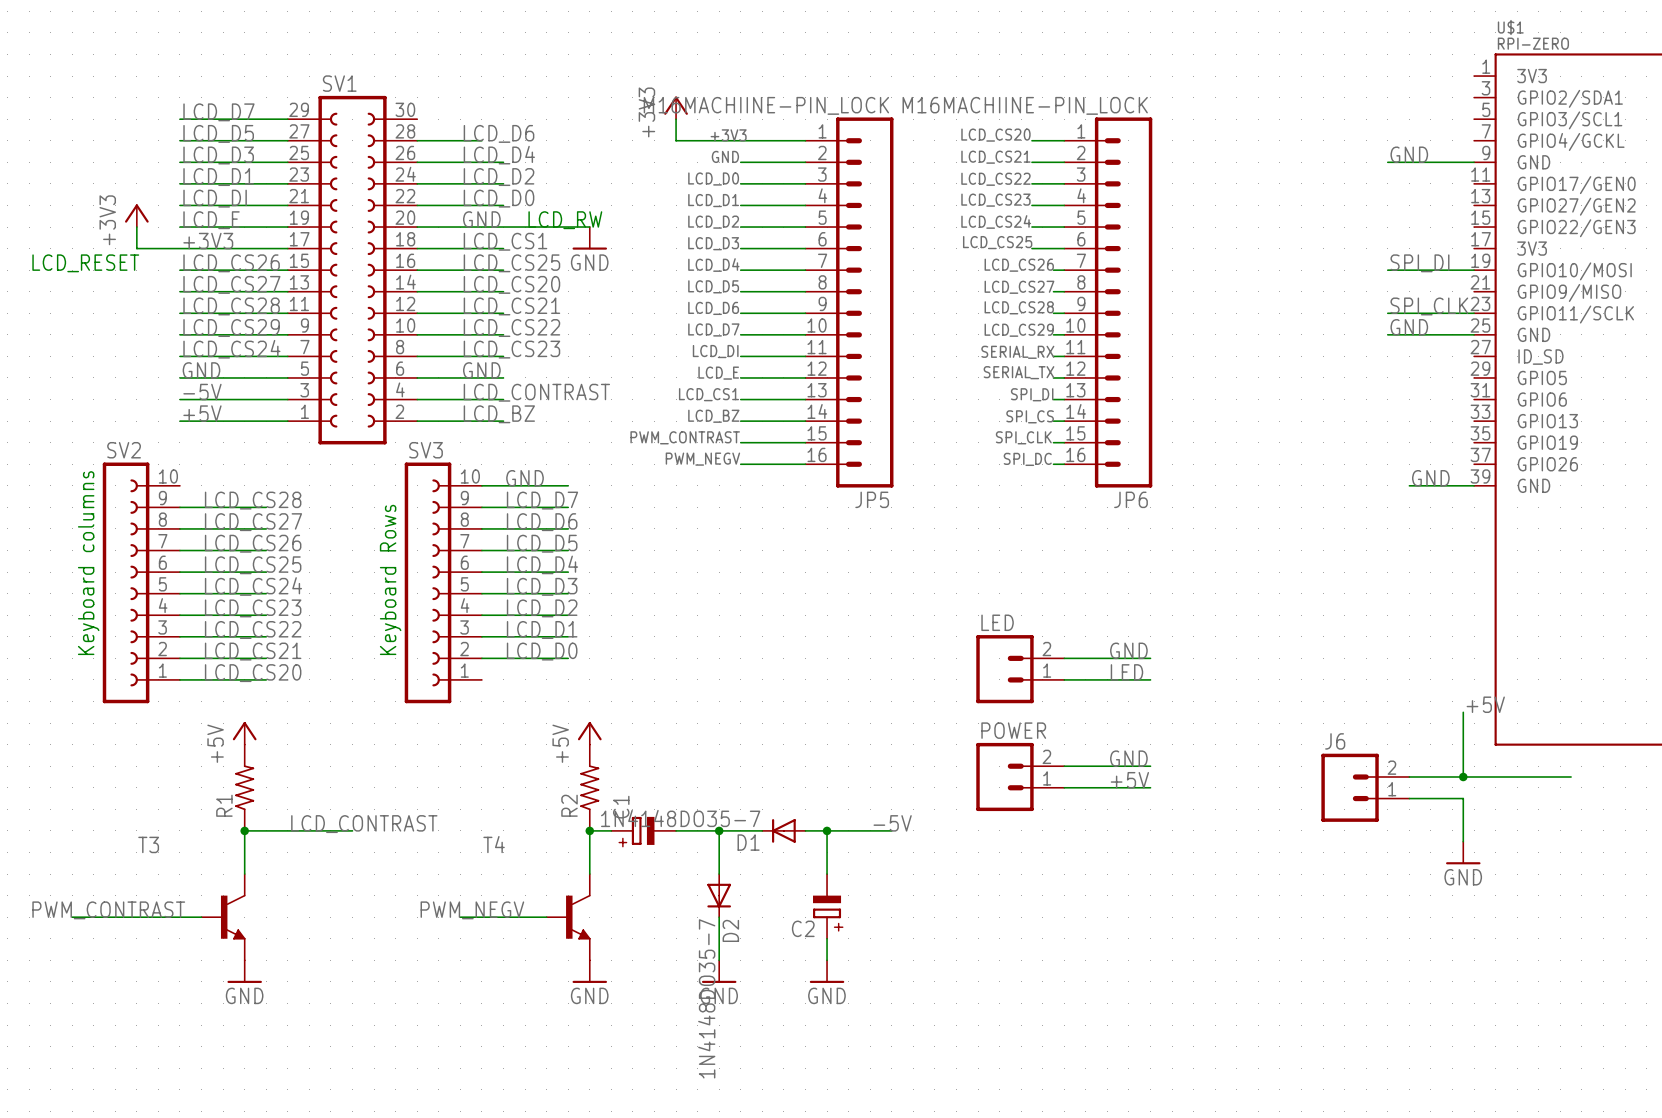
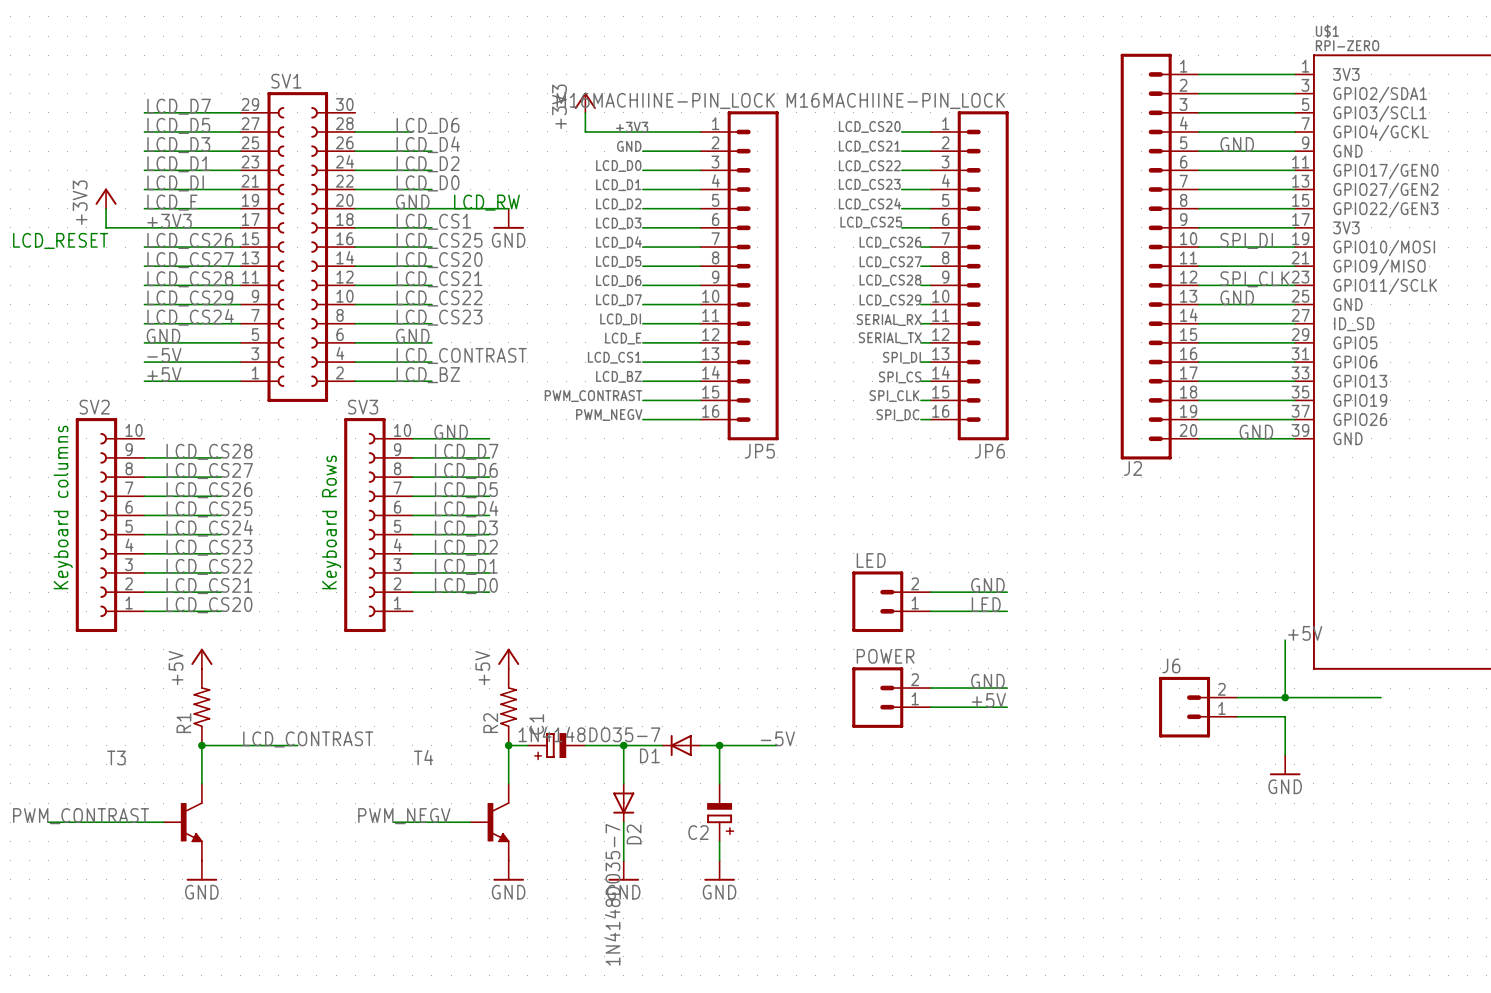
wire: none -> (1198, 74) (1294, 74)
wire: none -> (1198, 93) (1294, 93)
wire: none -> (1198, 112) (1294, 112)
wire: none -> (1198, 131) (1294, 131)
wire: none -> (1198, 151) (1218, 151)
wire: none -> (1198, 170) (1294, 170)
wire: none -> (1198, 189) (1294, 189)
wire: none -> (1198, 208) (1294, 208)
wire: none -> (1198, 227) (1294, 227)
wire: none -> (1198, 247) (1218, 247)
J2: none -> (1159, 256)
wire: none -> (1198, 266) (1294, 266)
wire: none -> (1198, 285) (1218, 285)
wire: none -> (1198, 304) (1218, 304)
wire: none -> (1198, 323) (1294, 323)
wire: none -> (1198, 342) (1294, 342)
wire: none -> (1198, 362) (1294, 362)
wire: none -> (1198, 381) (1294, 381)
wire: none -> (1198, 400) (1294, 400)
wire: none -> (1198, 419) (1294, 419)
wire: none -> (1198, 438) (1237, 438)

